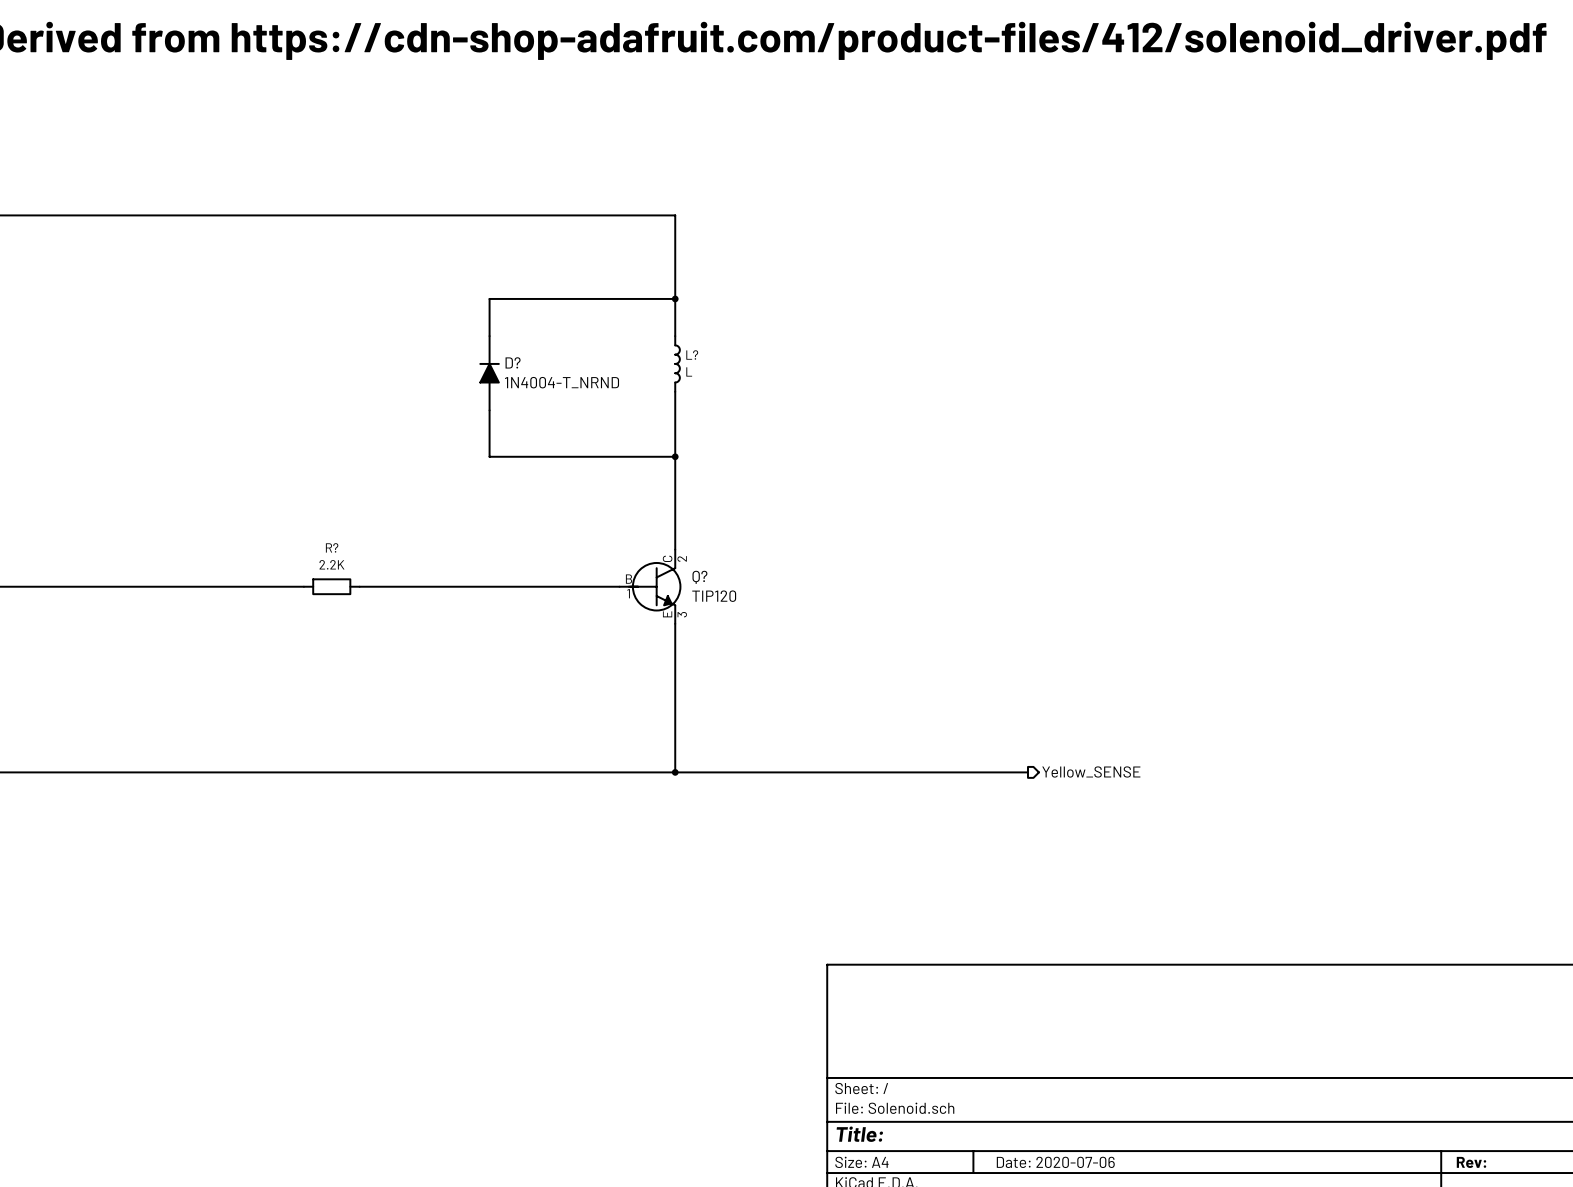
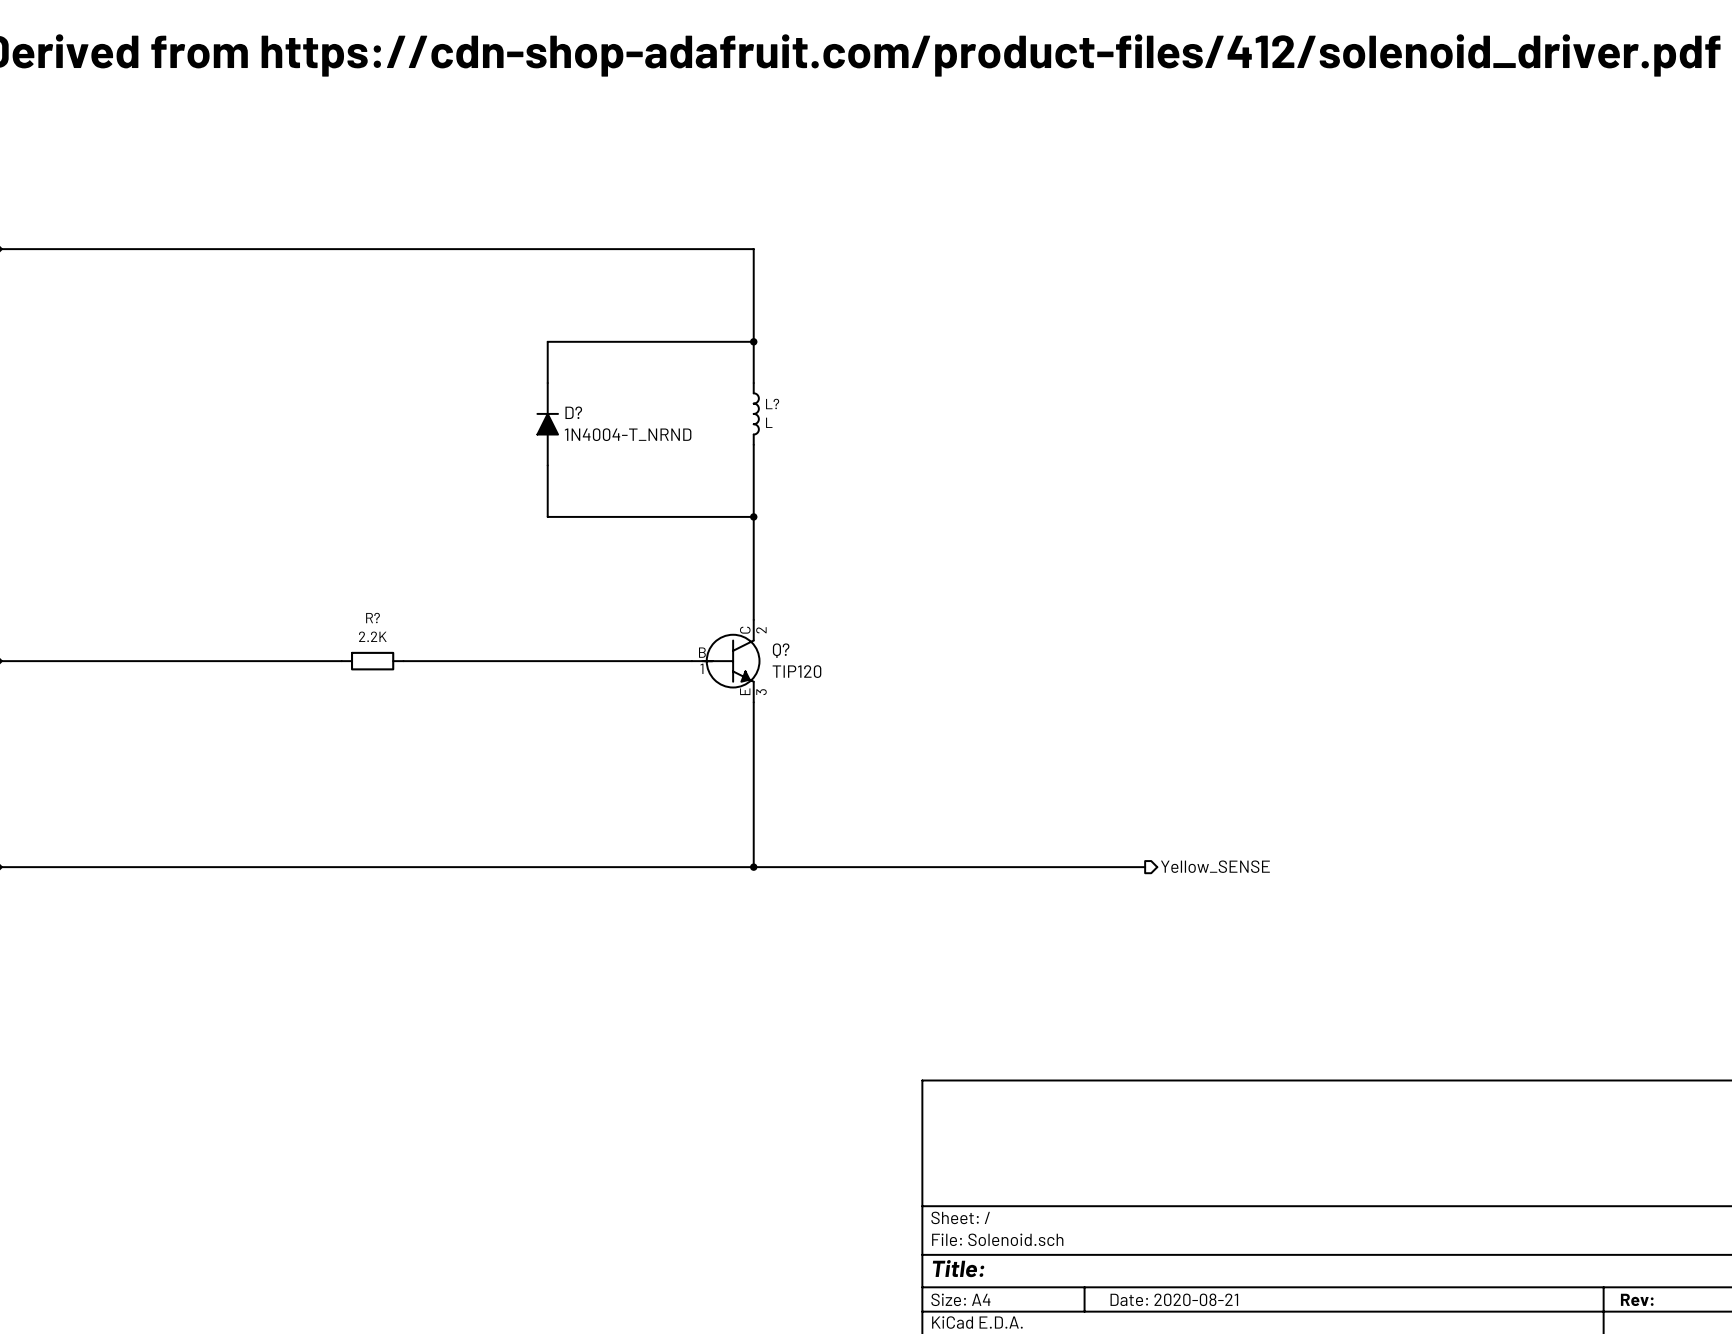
title block: Date: 2020-07-06 (1055, 1162) -> Date: 2020-08-21 (1174, 1299)

